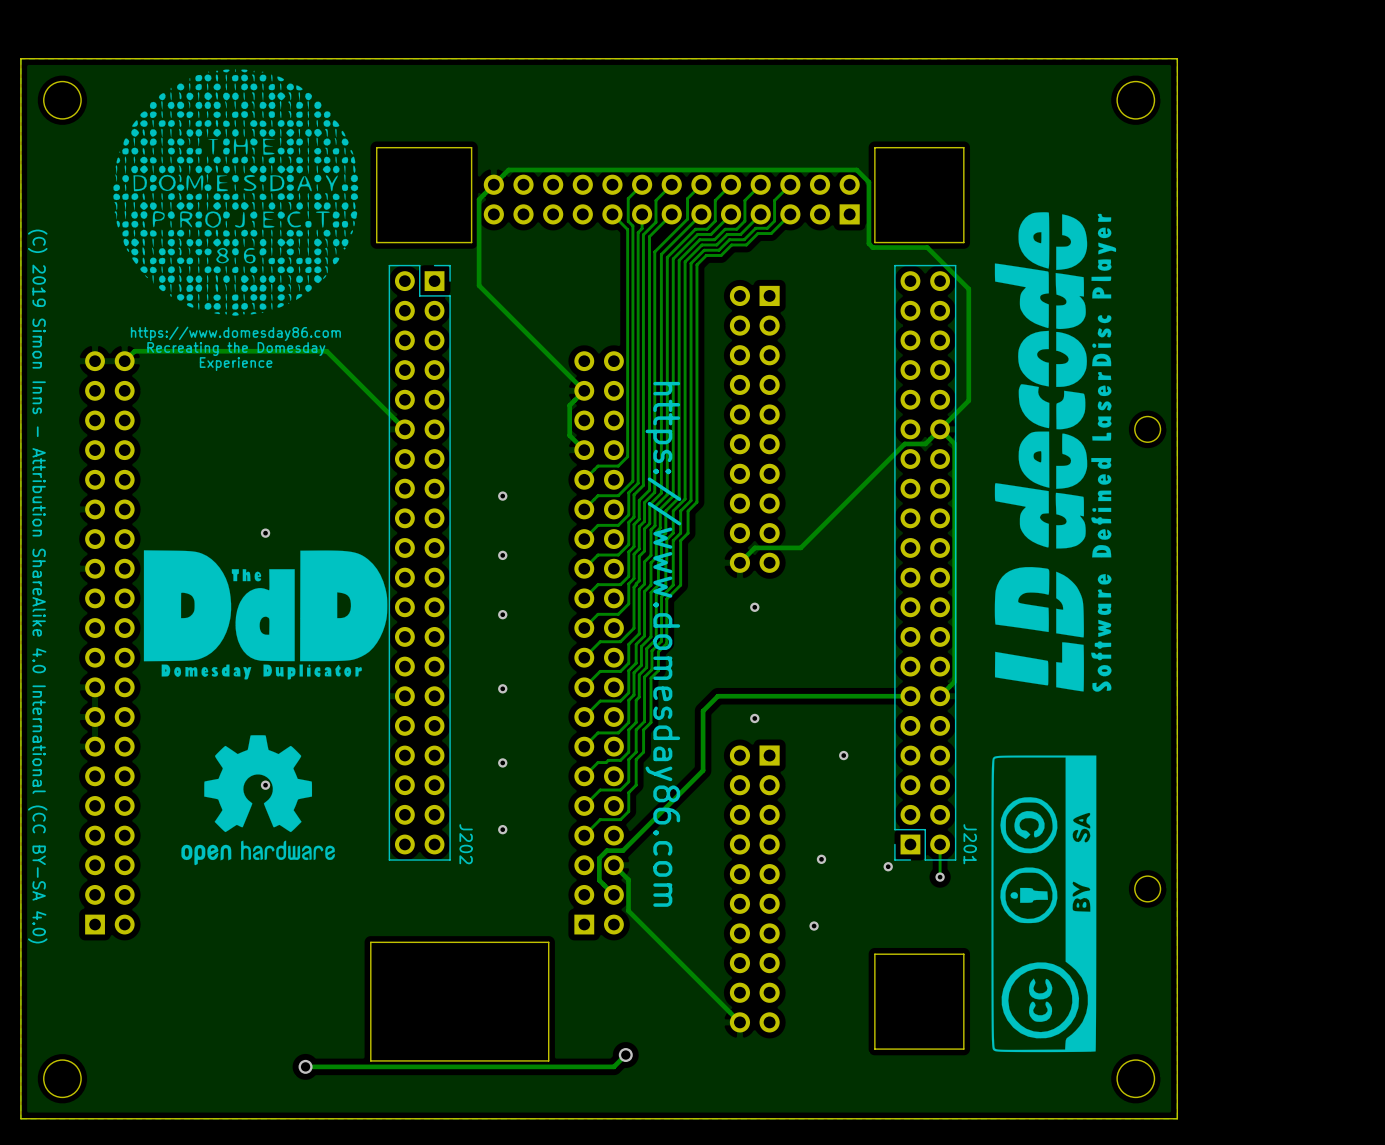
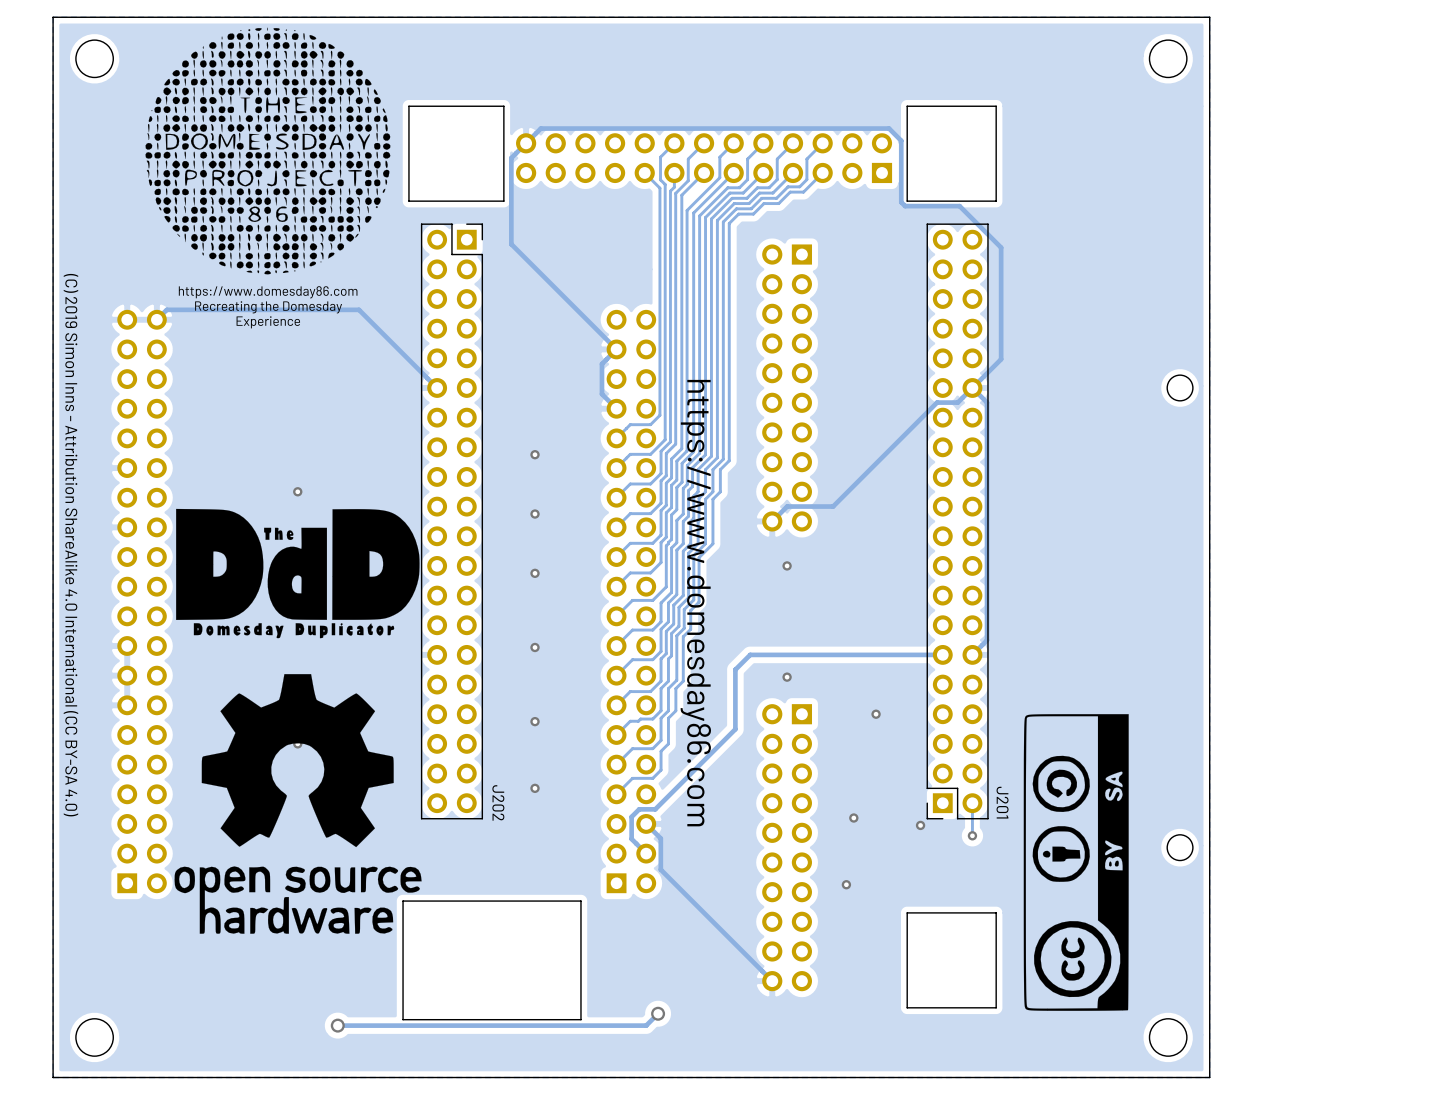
drawing: [994, 212, 1117, 692] -> none
drawing: none -> [174, 674, 422, 934]
drawing: [181, 735, 335, 866] -> none

